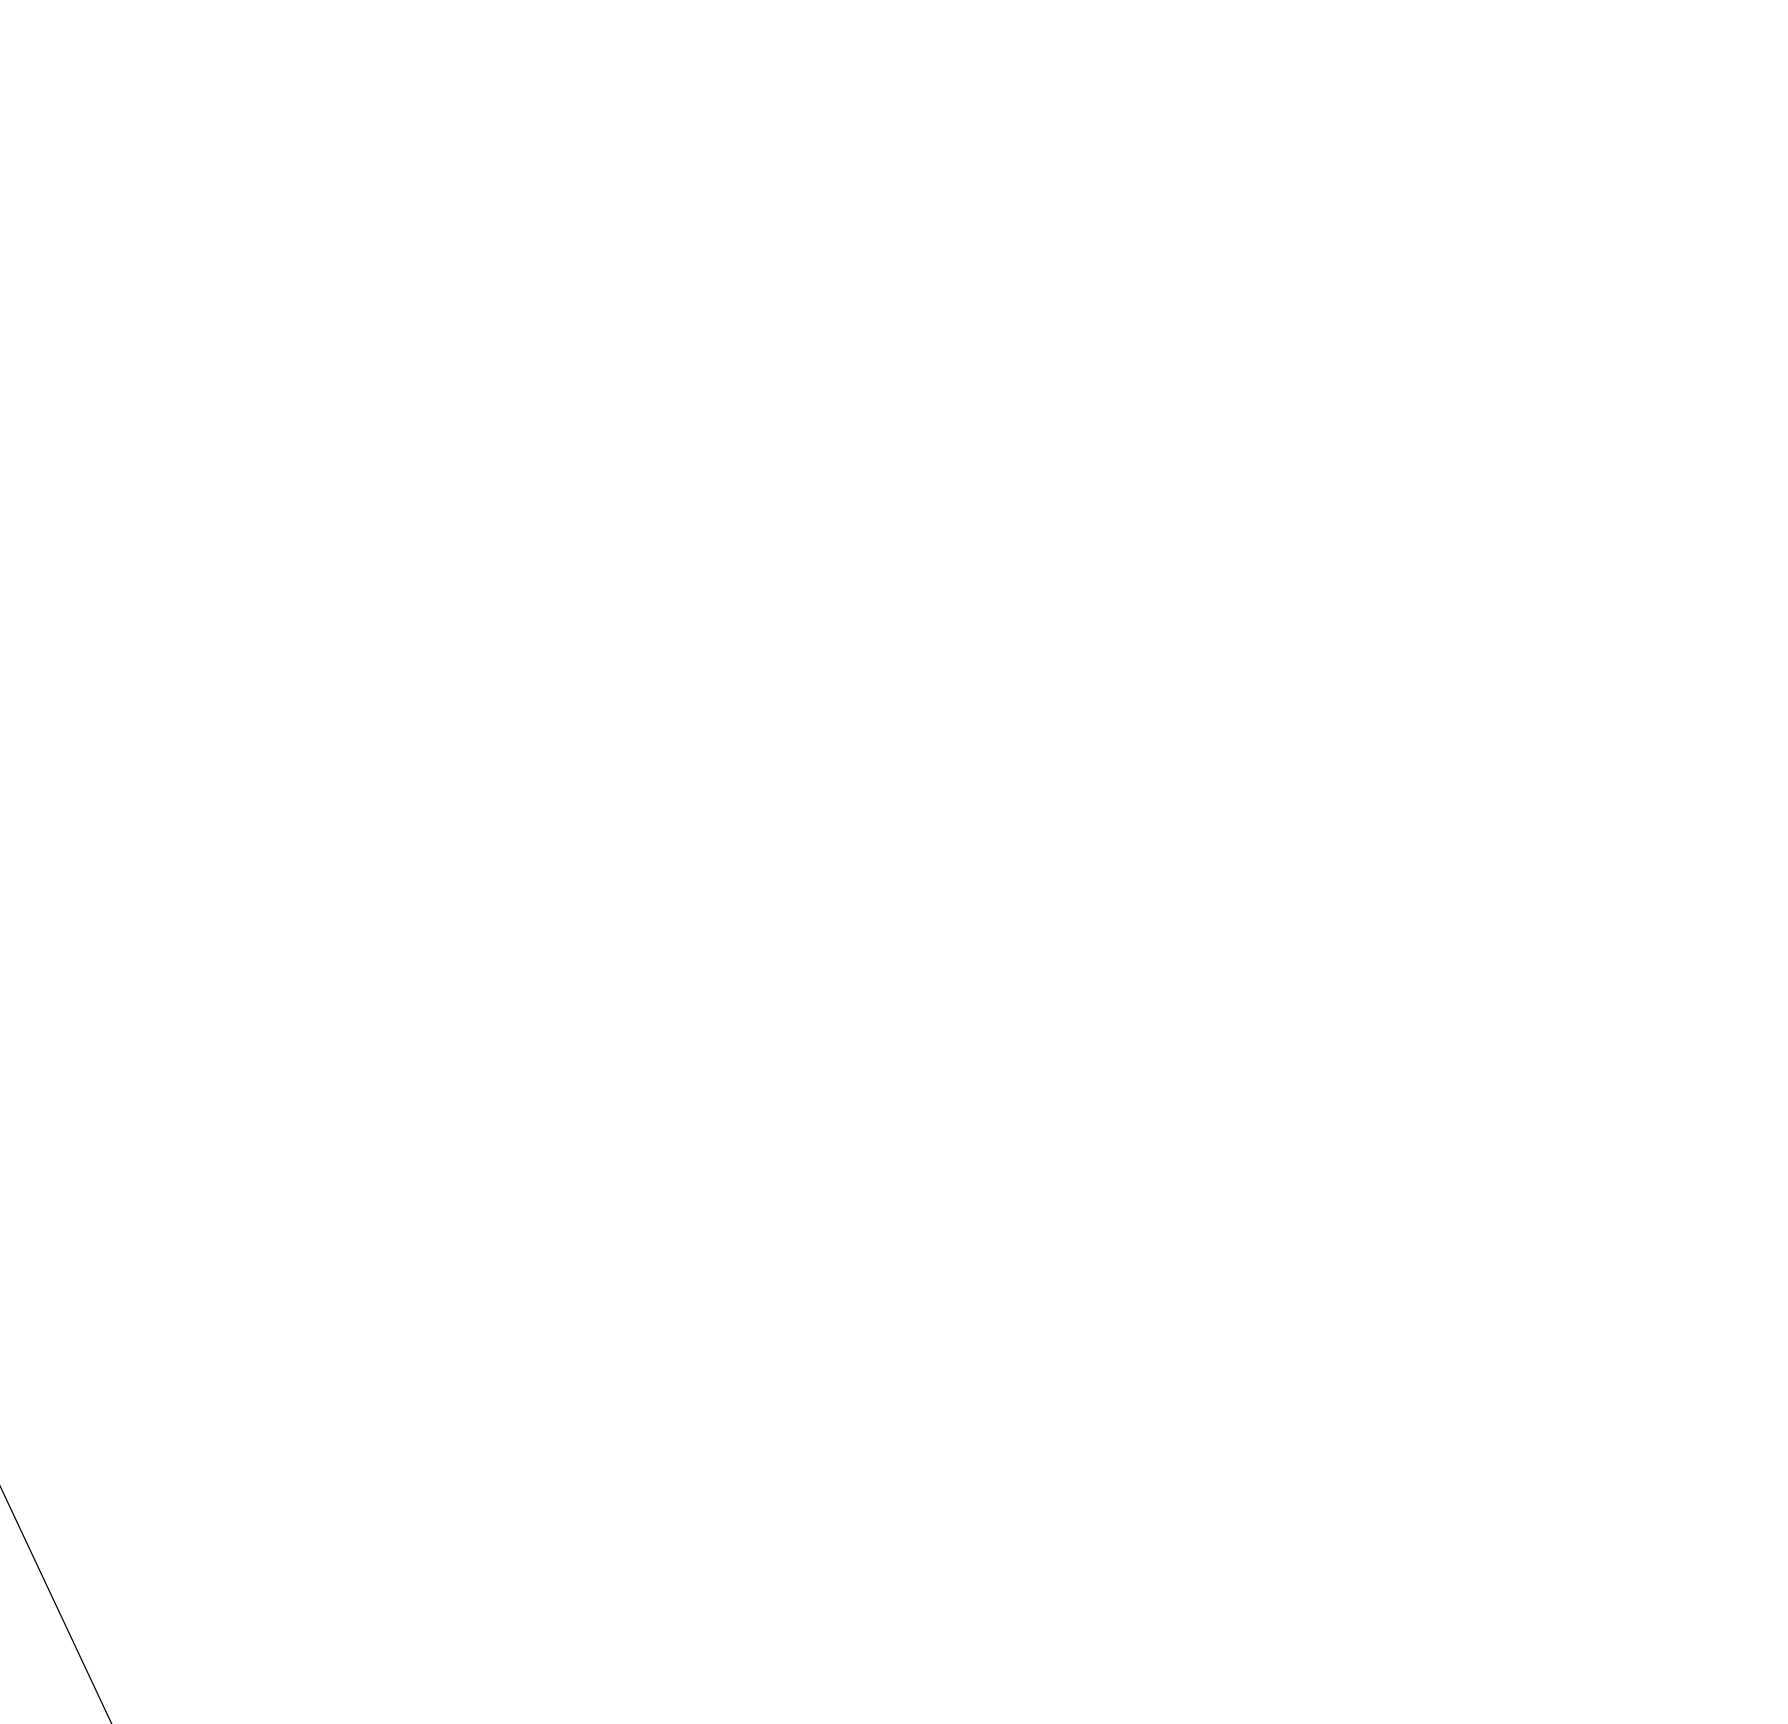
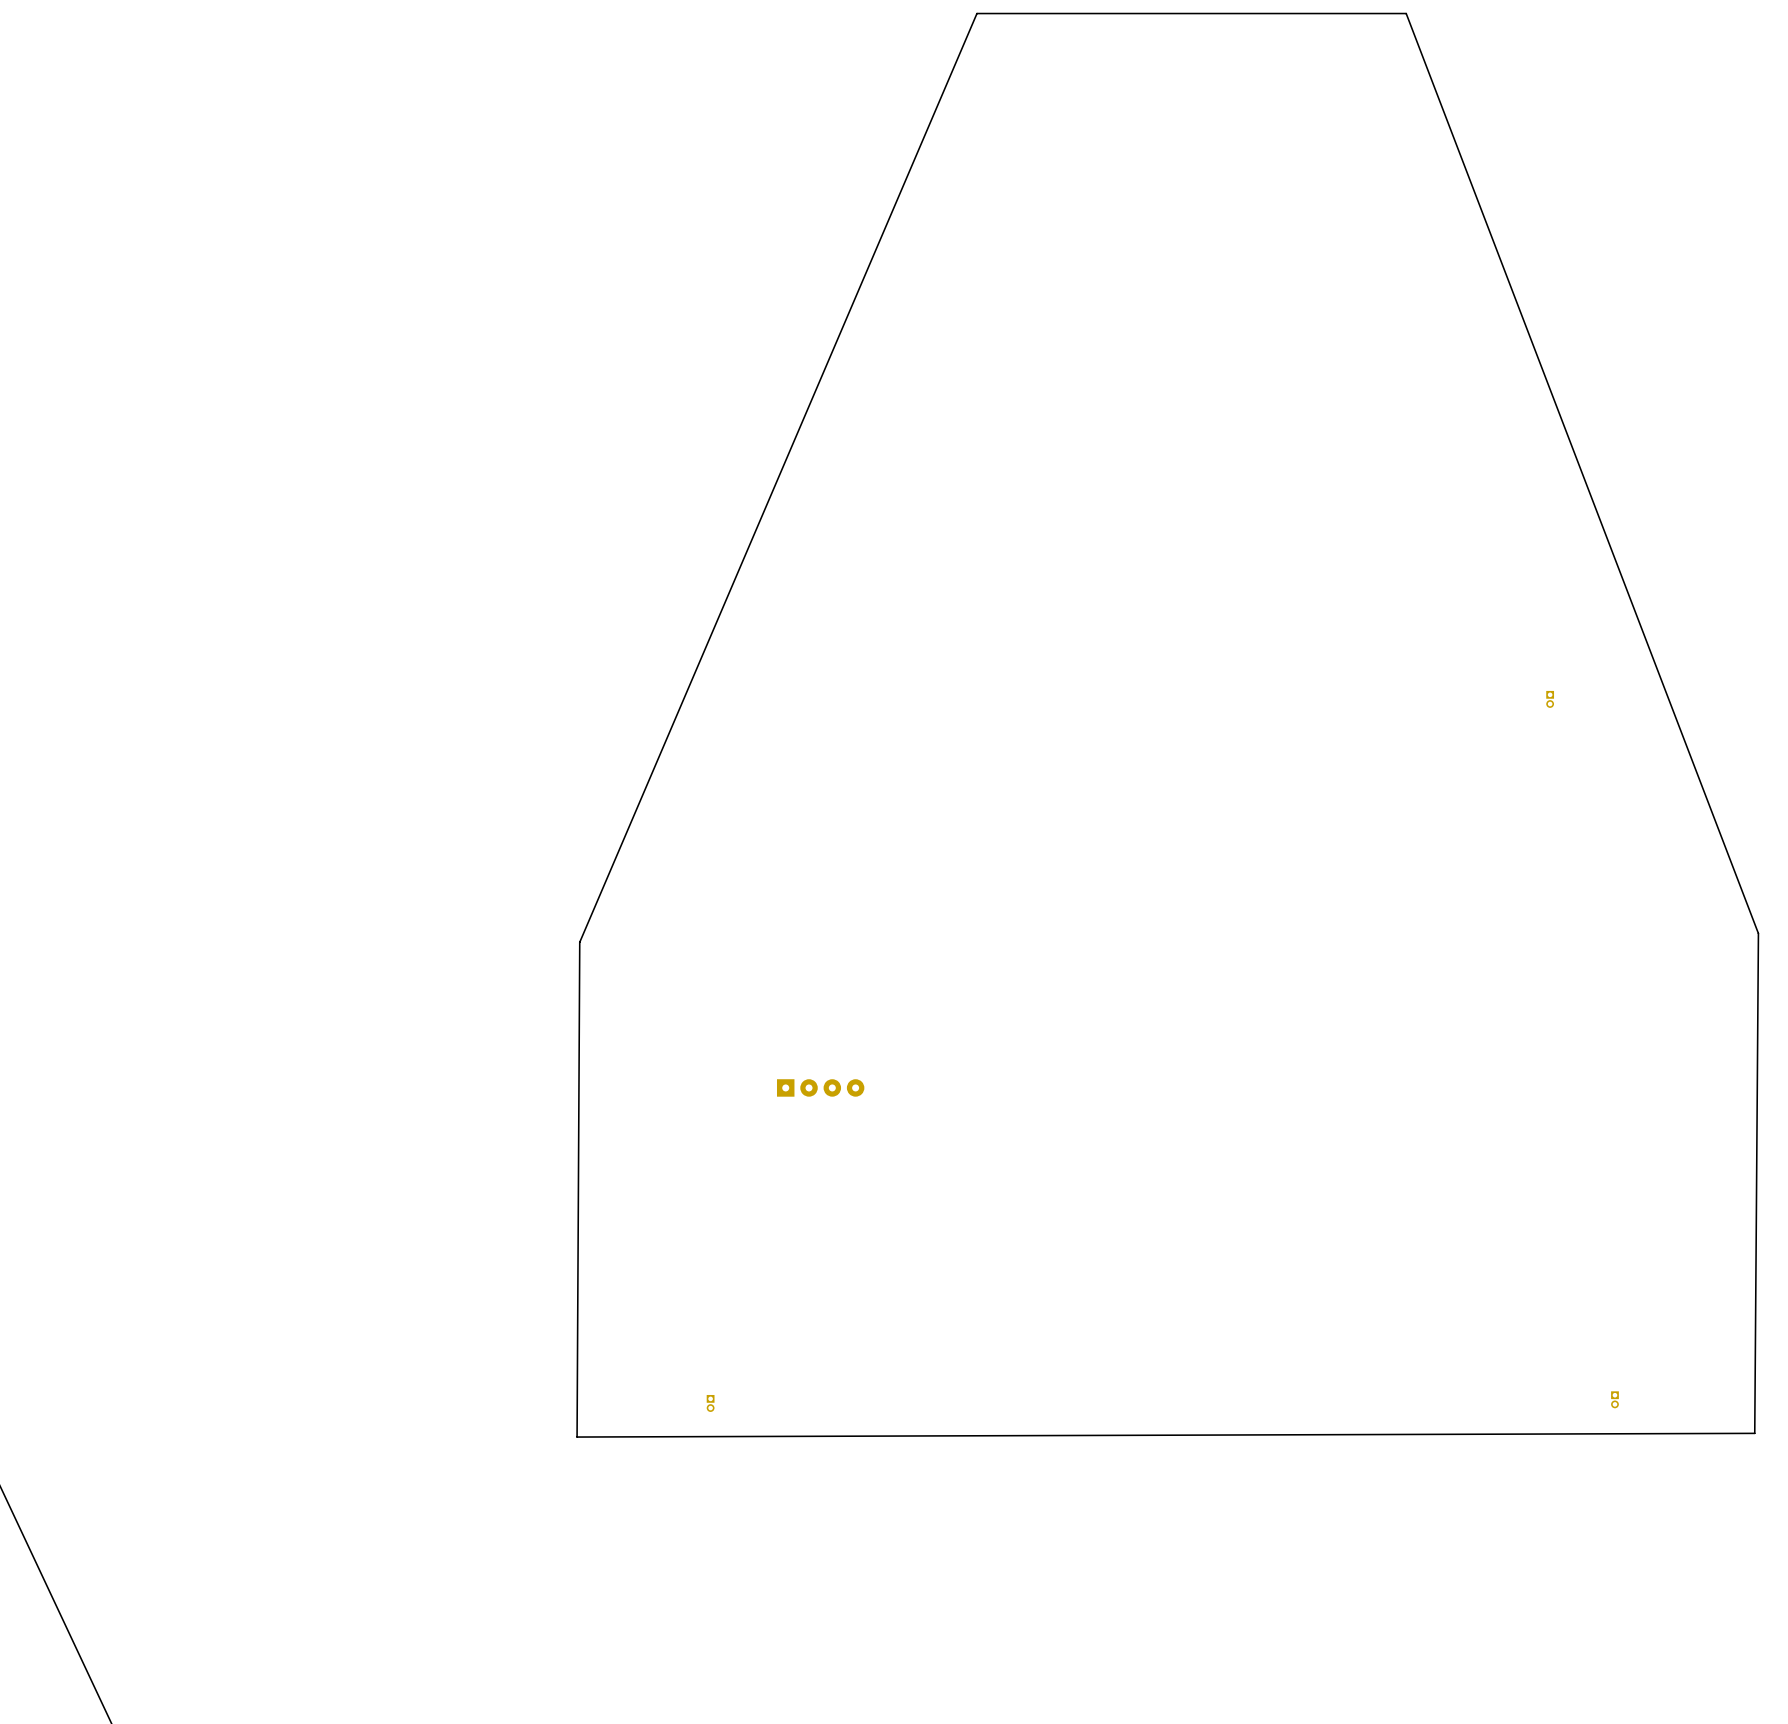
board edge: none -> (1406, 13) (1758, 933) (1754, 1433) (577, 1437) (579, 942) (976, 13) (1406, 13)
part: none -> (1550, 699)
part: none -> (820, 1087)
part: none -> (1614, 1399)
part: none -> (710, 1403)

